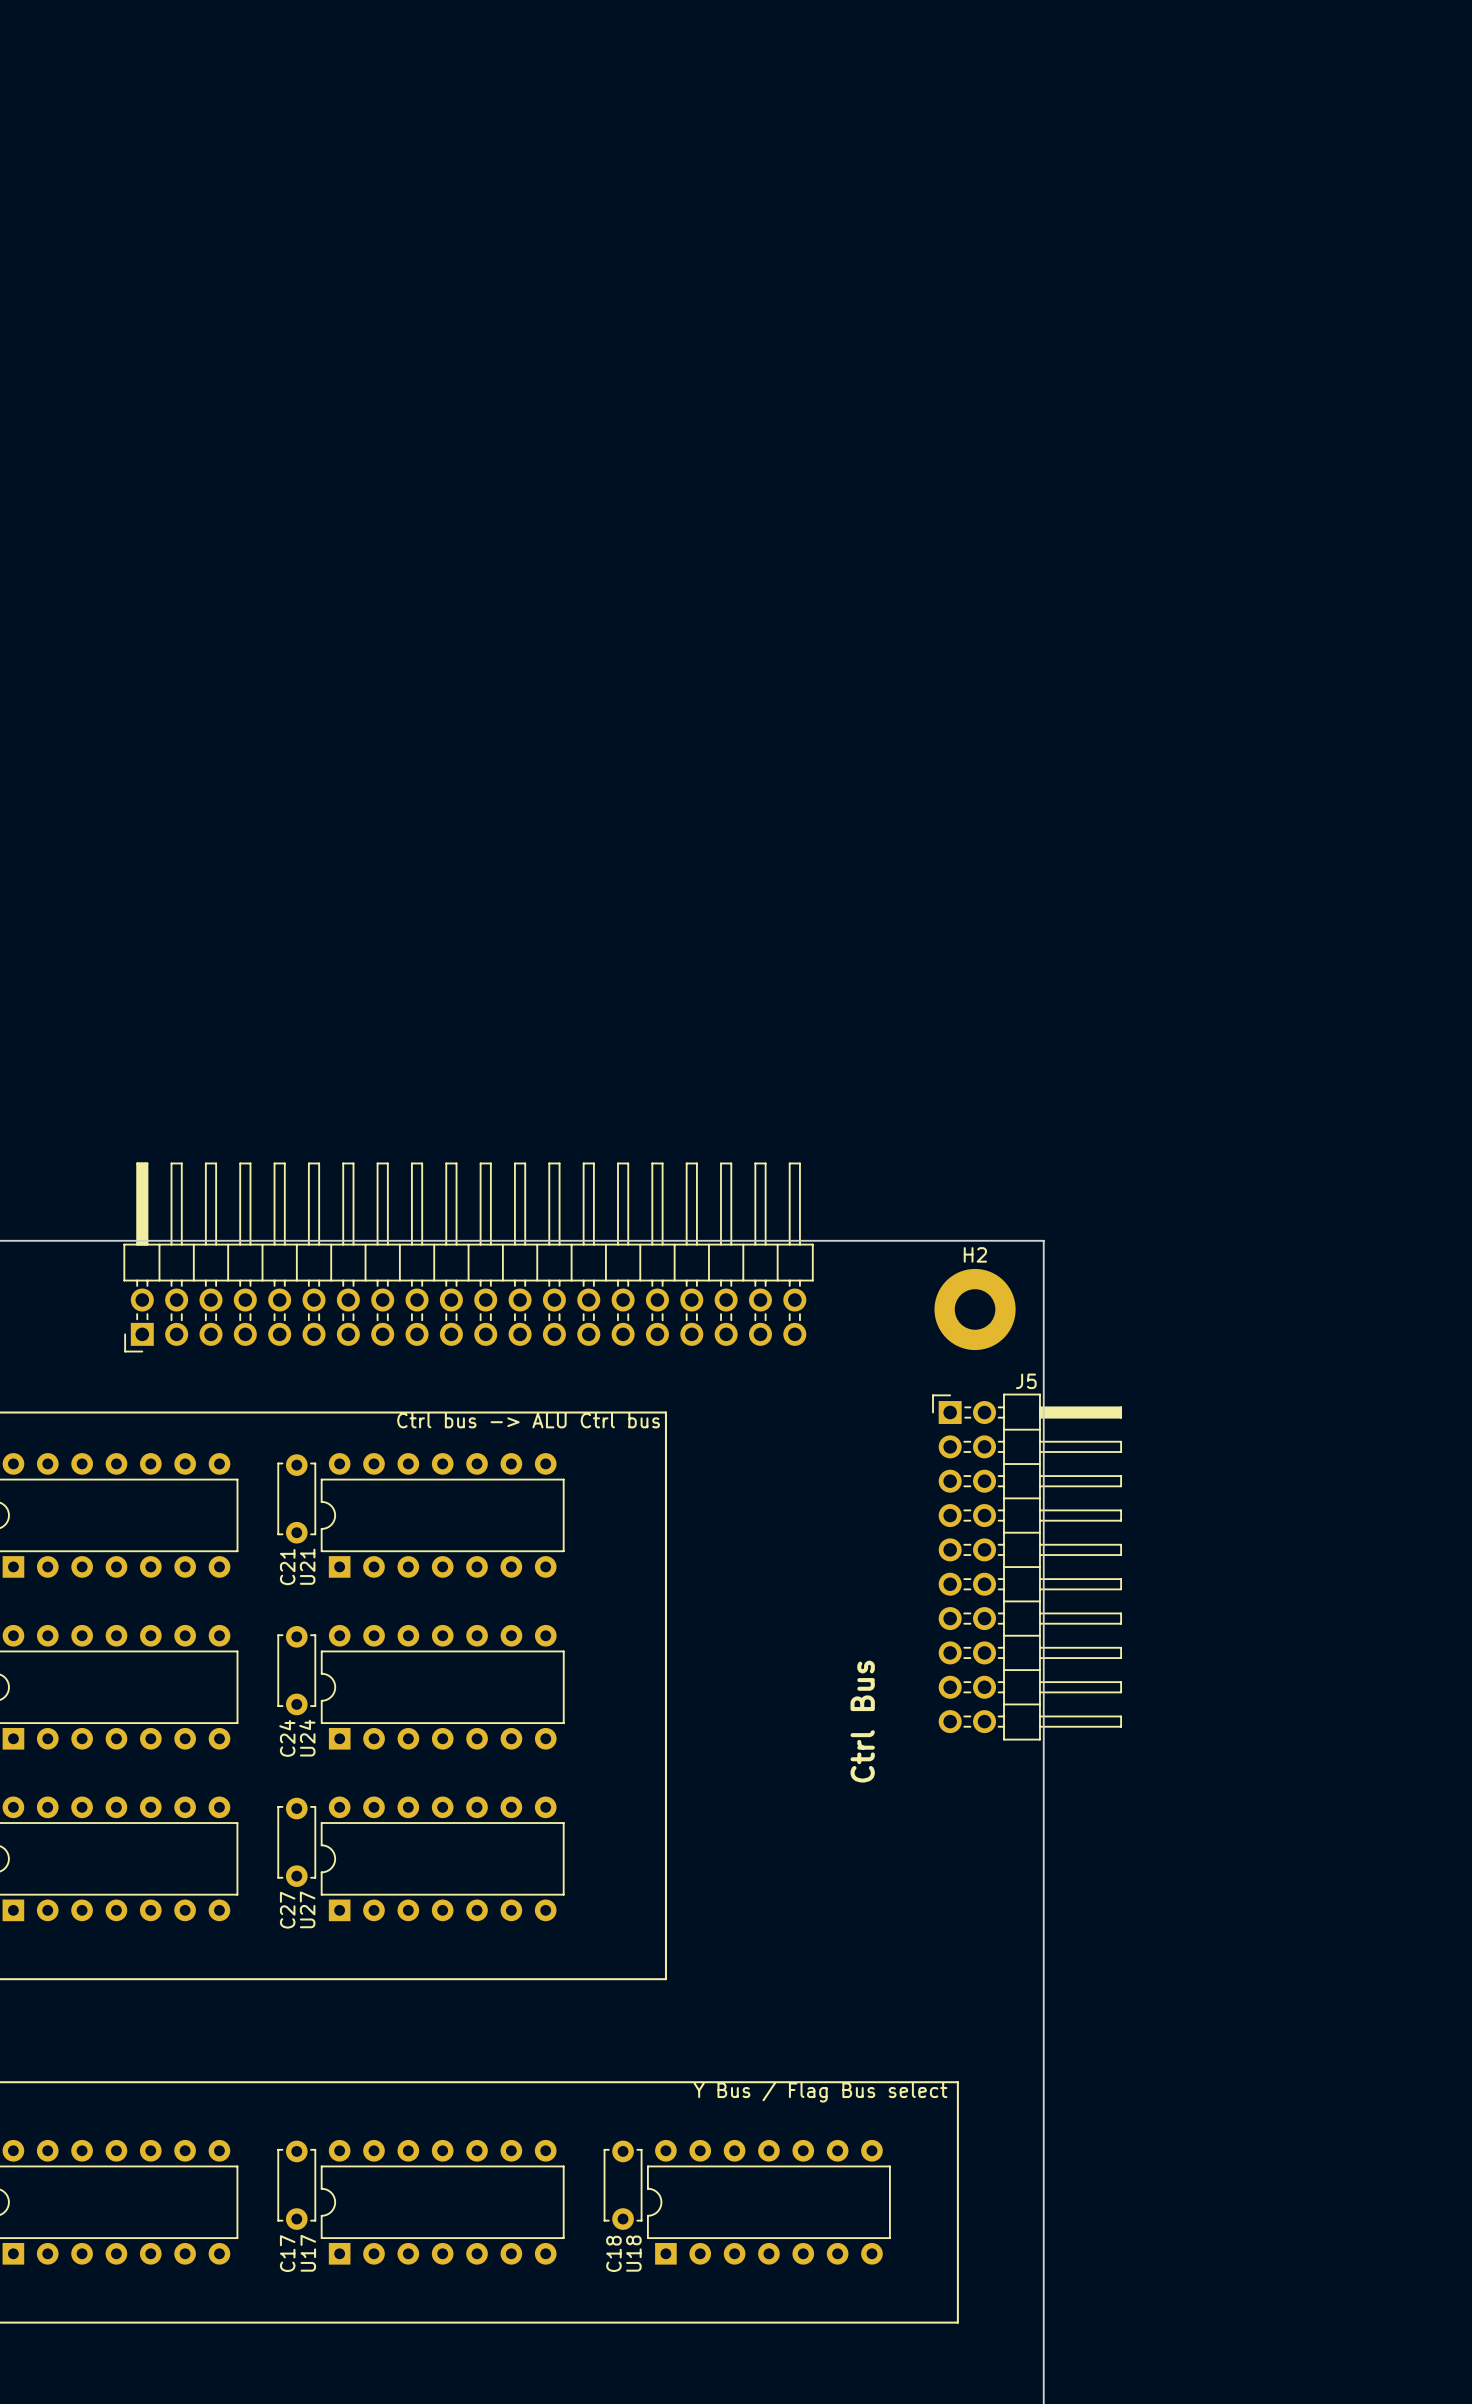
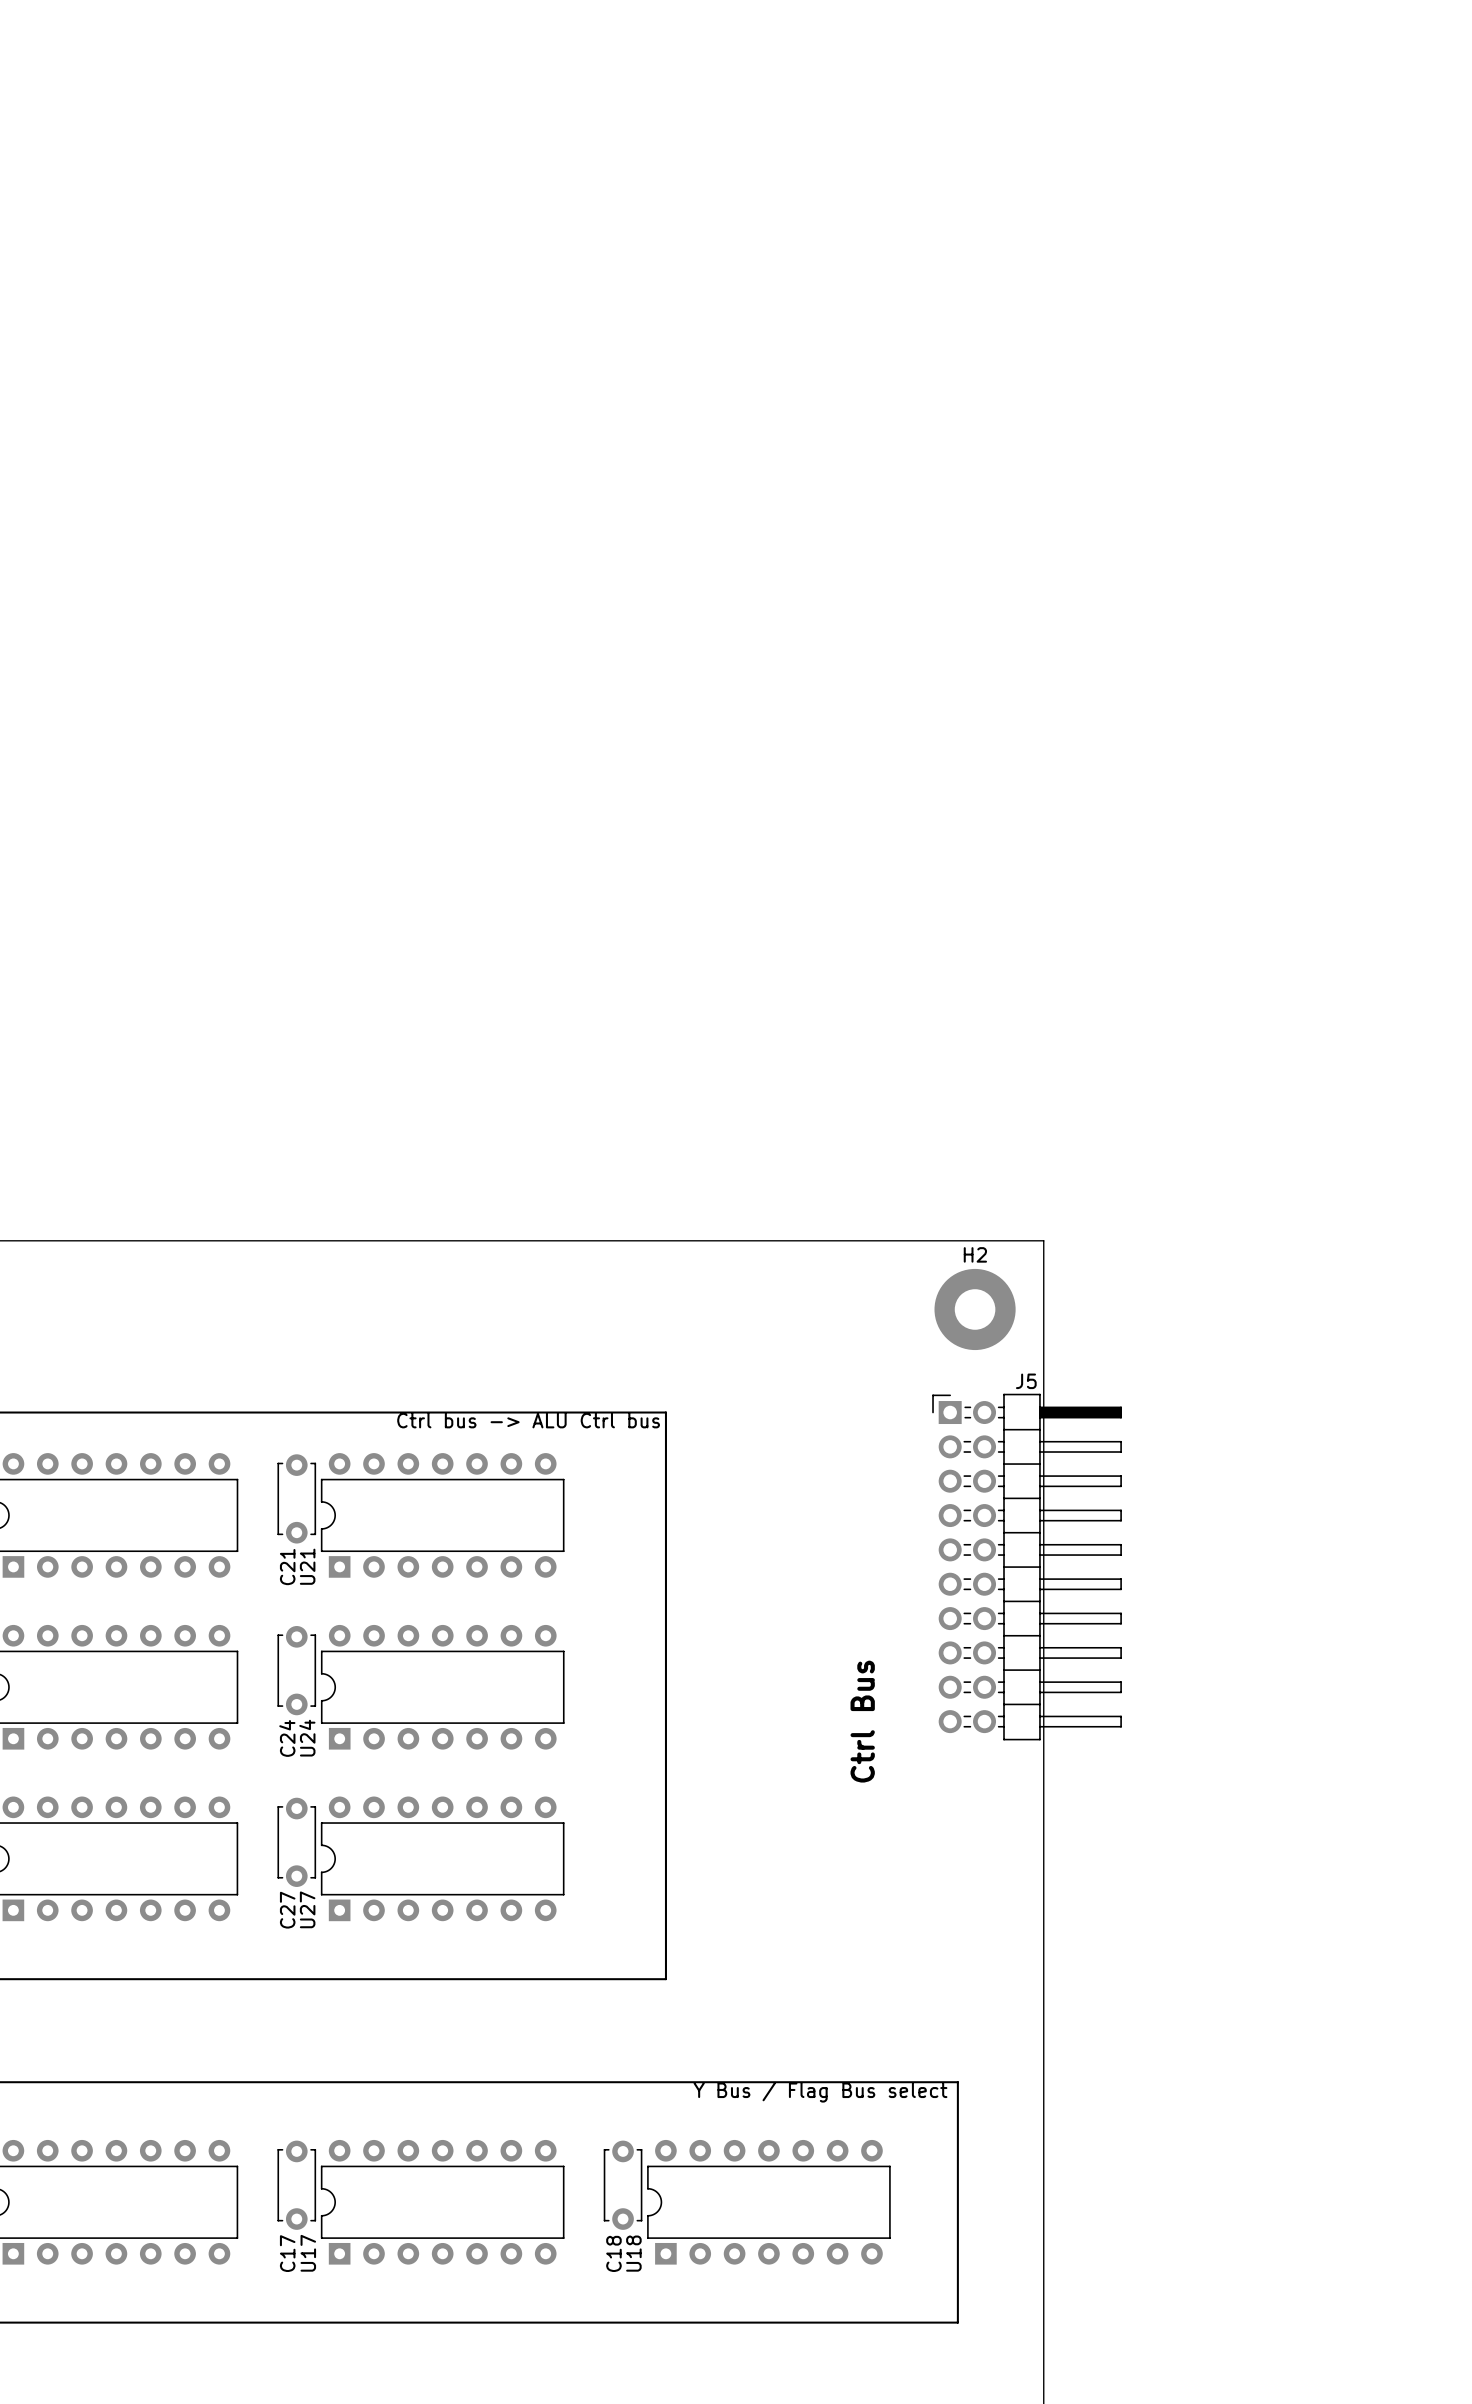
part: (468, 1257) -> none

